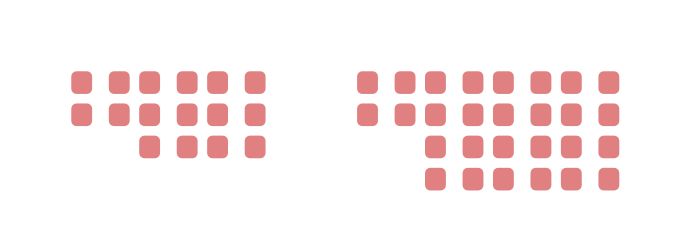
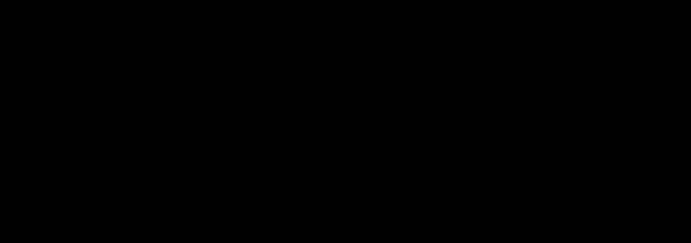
part: (100, 82) -> none
part: (168, 82) -> none
part: (236, 82) -> none
part: (386, 82) -> none
part: (454, 82) -> none
part: (522, 82) -> none
part: (590, 82) -> none
part: (100, 114) -> none
part: (168, 114) -> none
part: (236, 114) -> none
part: (386, 114) -> none
part: (454, 114) -> none
part: (522, 114) -> none
part: (590, 114) -> none
part: (168, 146) -> none
part: (236, 146) -> none
part: (454, 146) -> none
part: (522, 146) -> none
part: (590, 146) -> none
part: (454, 179) -> none
part: (522, 179) -> none
part: (590, 179) -> none

